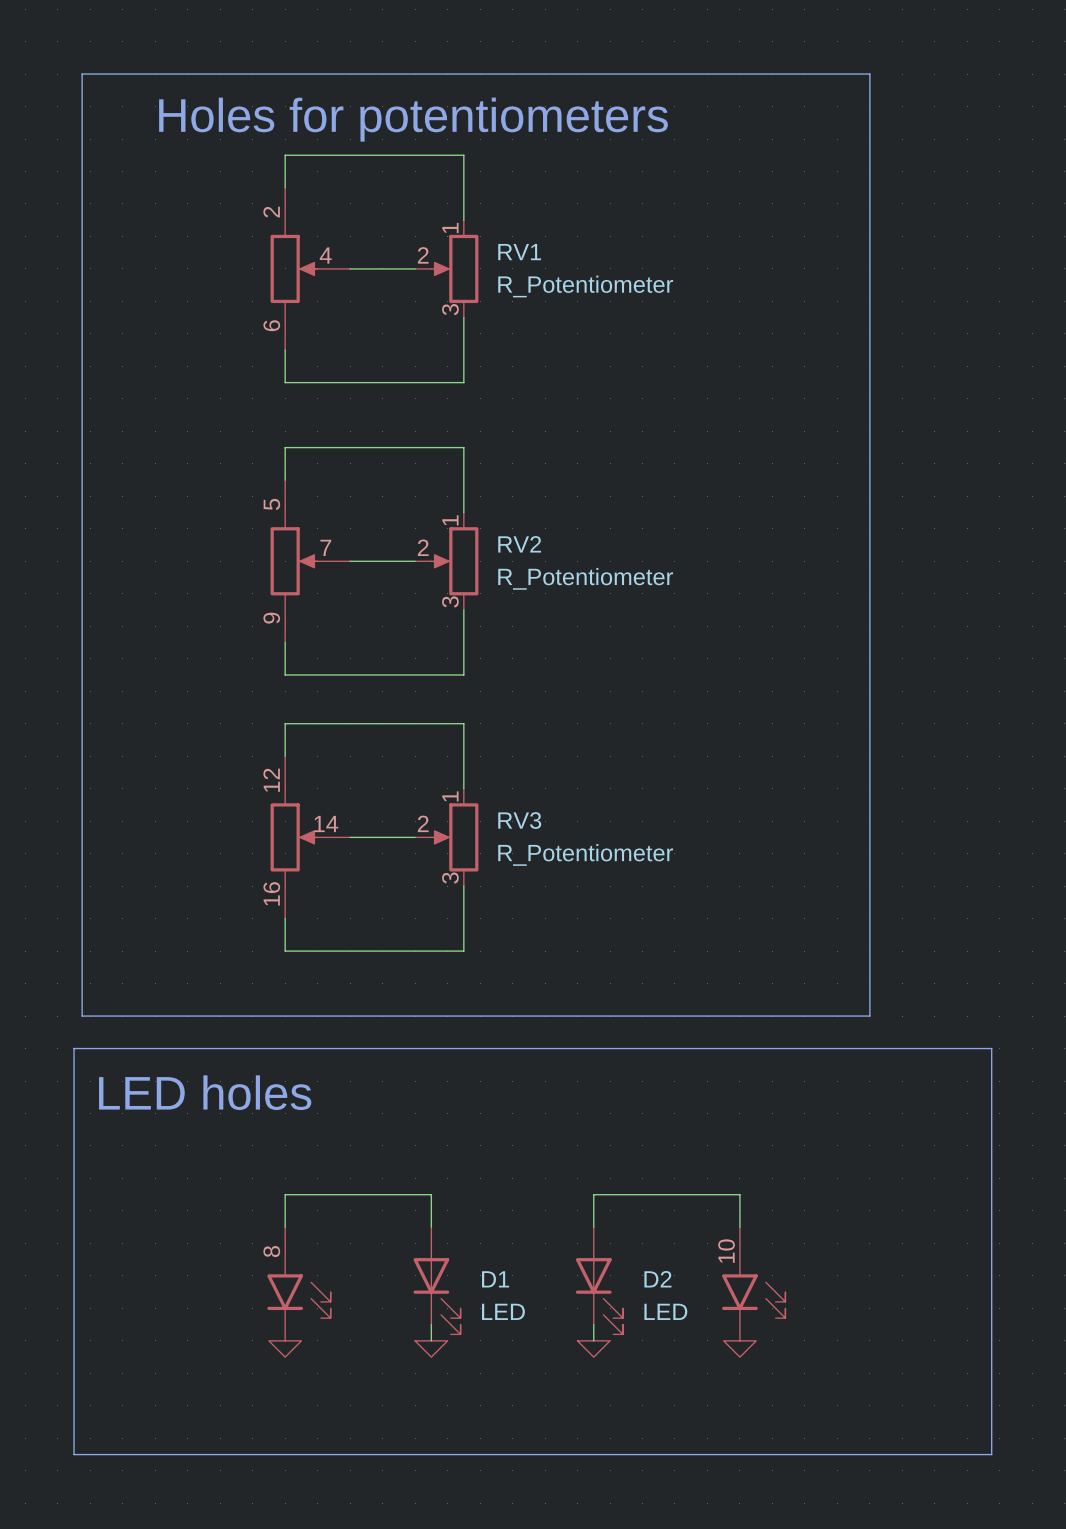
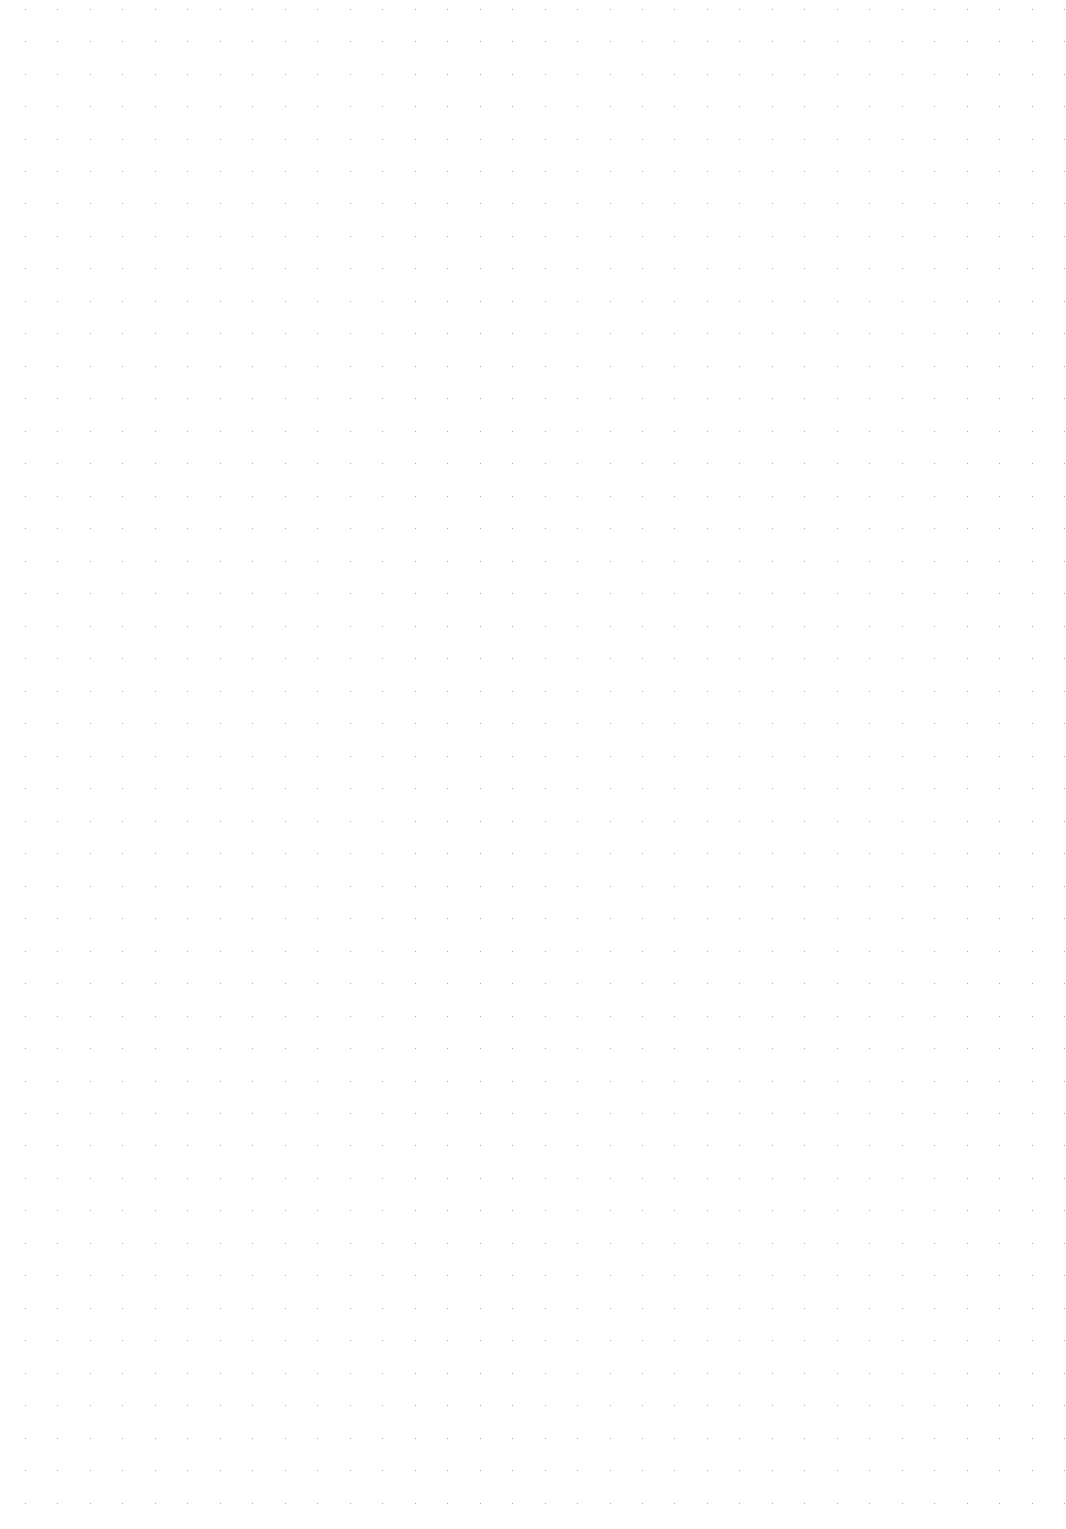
line: (82, 74) (869, 74) (869, 1016) (82, 1016) (82, 74) -> none
text: Holes for potentiometers (413, 119) -> none
wire: (285, 187) (285, 155) (463, 155) (463, 220) -> none
part: (310, 268) -> none
wire: (350, 268) (415, 268) -> none
RV1: R_Potentiometer (446, 268) -> none
wire: (463, 317) (463, 382) (285, 382) (285, 350) -> none
wire: (285, 480) (285, 447) (463, 447) (463, 512) -> none
part: (310, 561) -> none
wire: (350, 561) (415, 561) -> none
RV2: R_Potentiometer (446, 561) -> none
wire: (463, 610) (463, 674) (285, 674) (285, 642) -> none
wire: (285, 756) (285, 723) (463, 723) (463, 788) -> none
part: (310, 837) -> none
wire: (350, 837) (415, 837) -> none
RV3: R_Potentiometer (446, 837) -> none
wire: (463, 886) (463, 951) (285, 951) (285, 918) -> none
line: (74, 1048) (991, 1048) (991, 1454) (74, 1454) (74, 1048) -> none
text: LED holes (205, 1092) -> none
wire: (285, 1227) (285, 1194) (431, 1194) (431, 1227) -> none
wire: (593, 1227) (593, 1194) (739, 1194) (739, 1227) -> none
D1: LED (437, 1280) -> none
D2: LED (599, 1280) -> none
part: (298, 1292) -> none
part: (753, 1292) -> none
wire: (431, 1324) (431, 1340) -> none
wire: (593, 1324) (593, 1340) -> none
power symbol: (431, 1349) -> none
power symbol: (593, 1349) -> none

